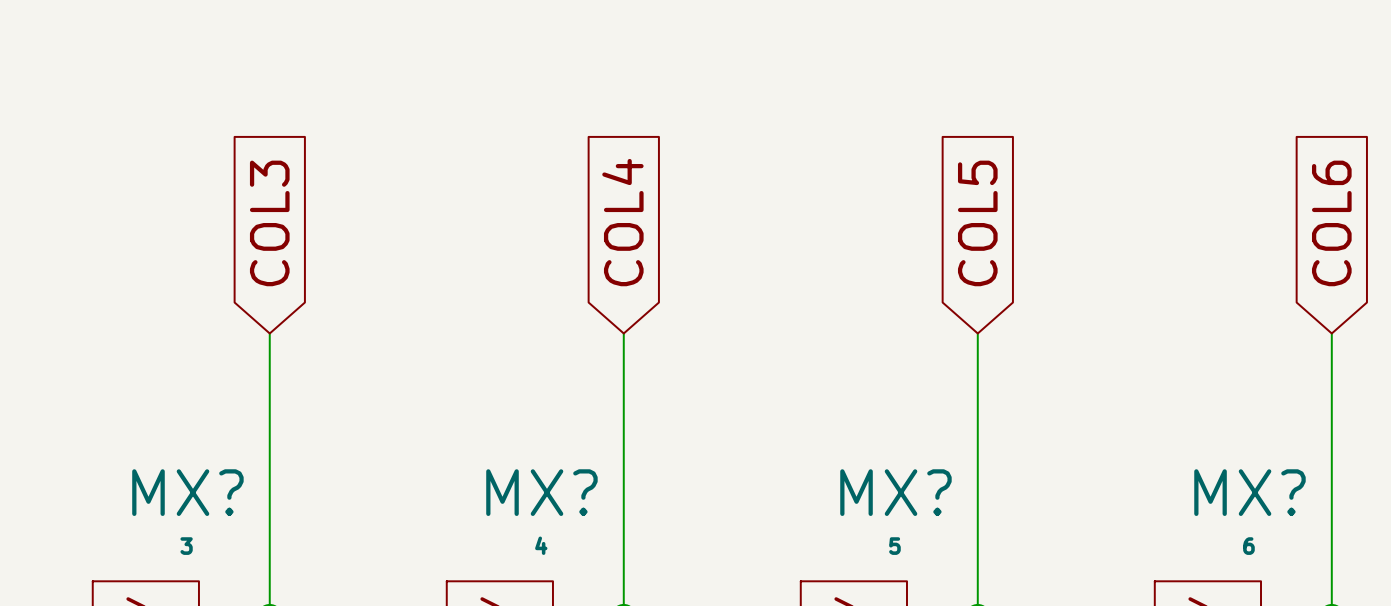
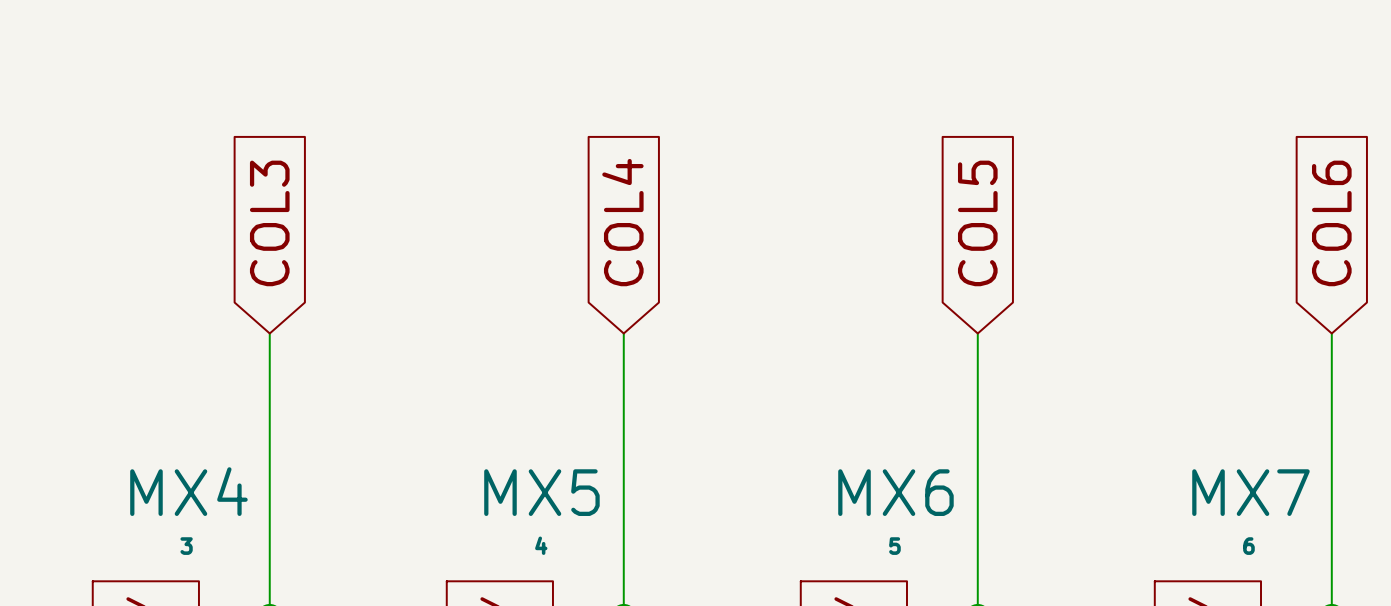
MX? name: MX? (187, 492) -> MX4 (188, 491)
MX? name: MX? (541, 492) -> MX5 (541, 492)
MX? name: MX? (895, 492) -> MX6 (895, 492)
MX? name: MX? (1249, 492) -> MX7 (1250, 492)

